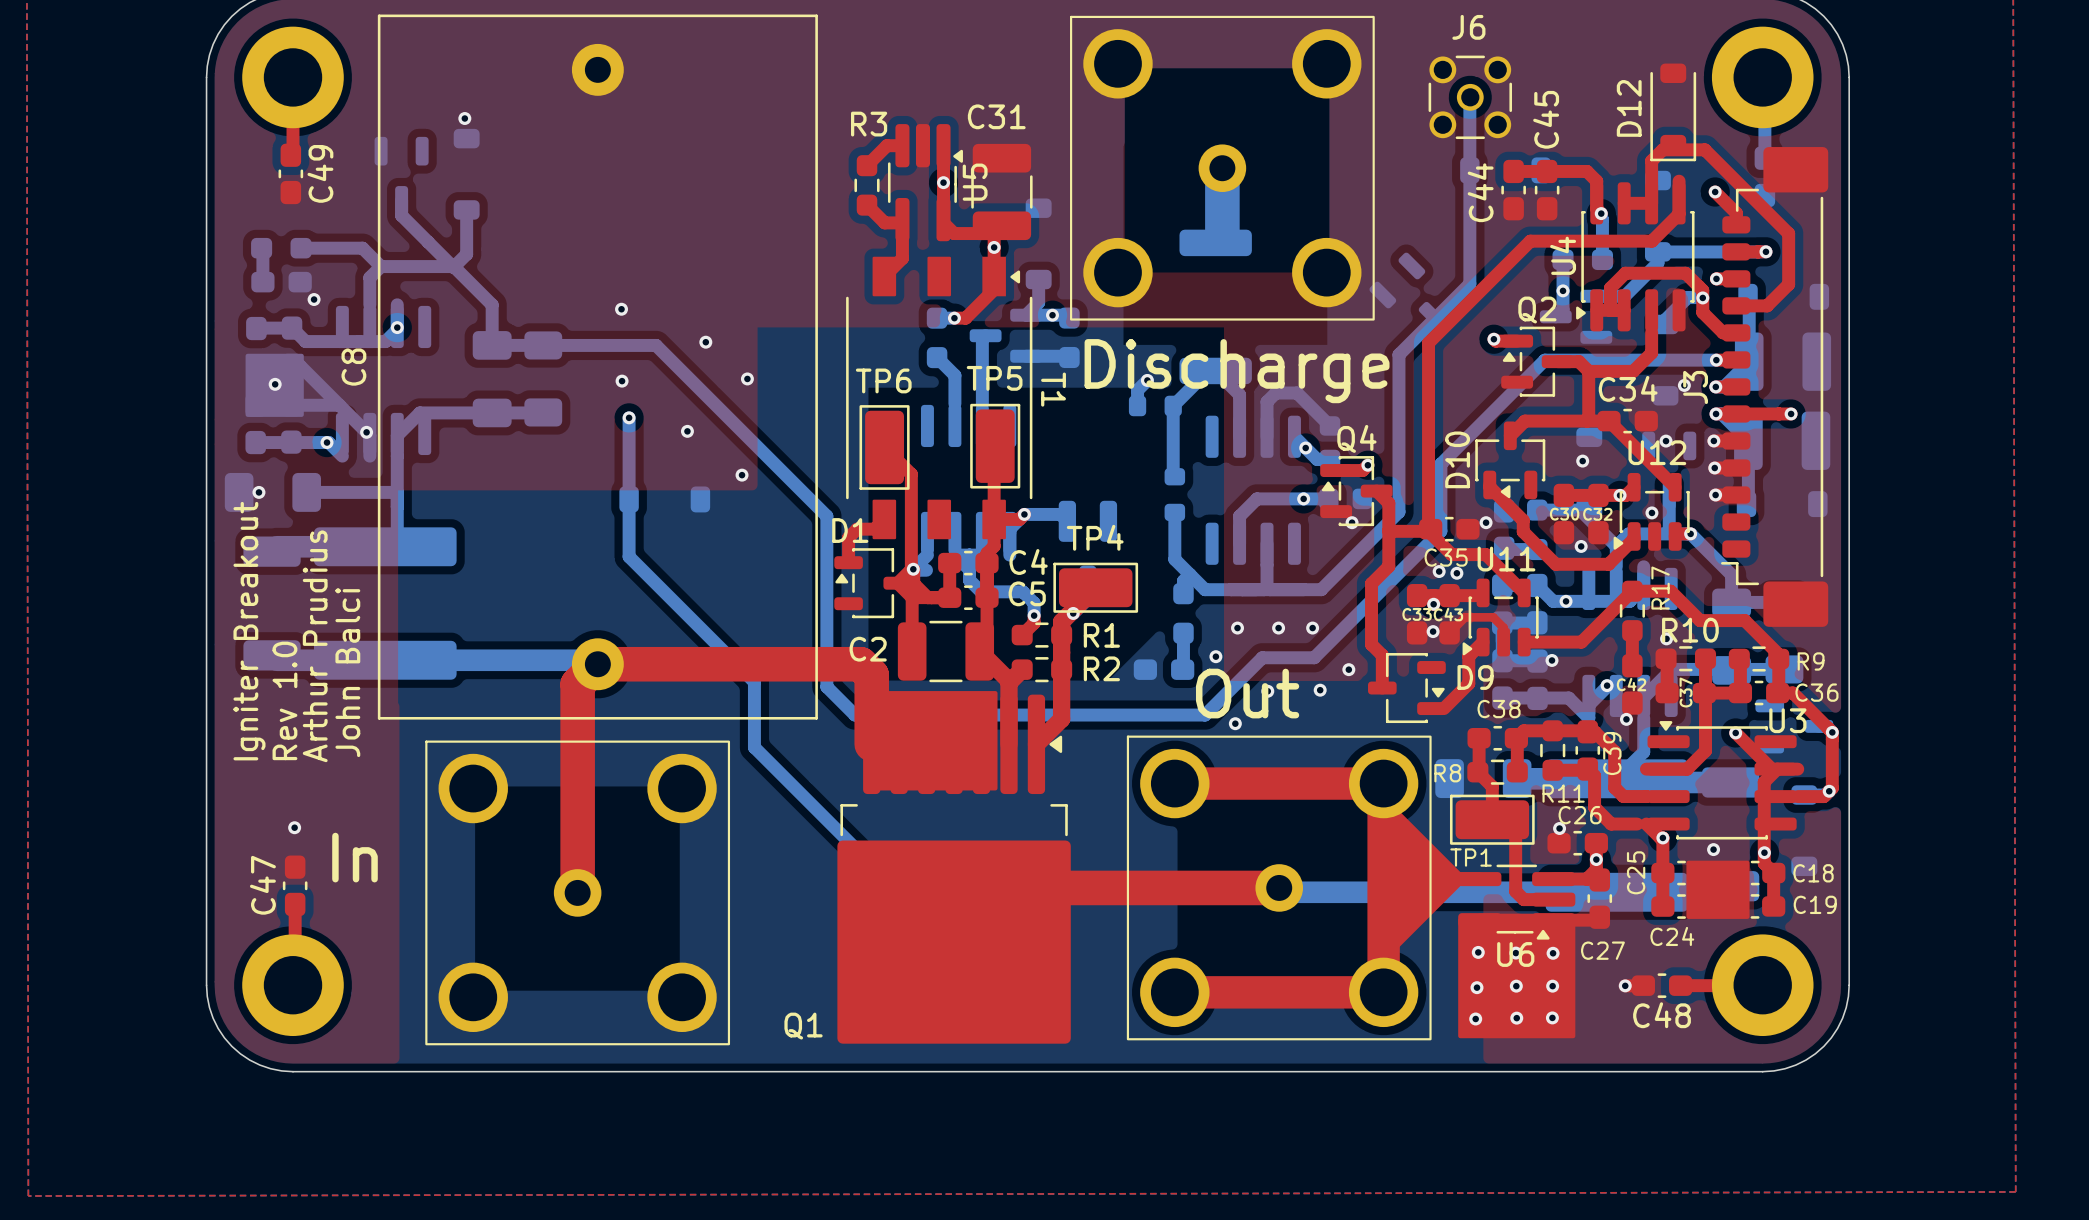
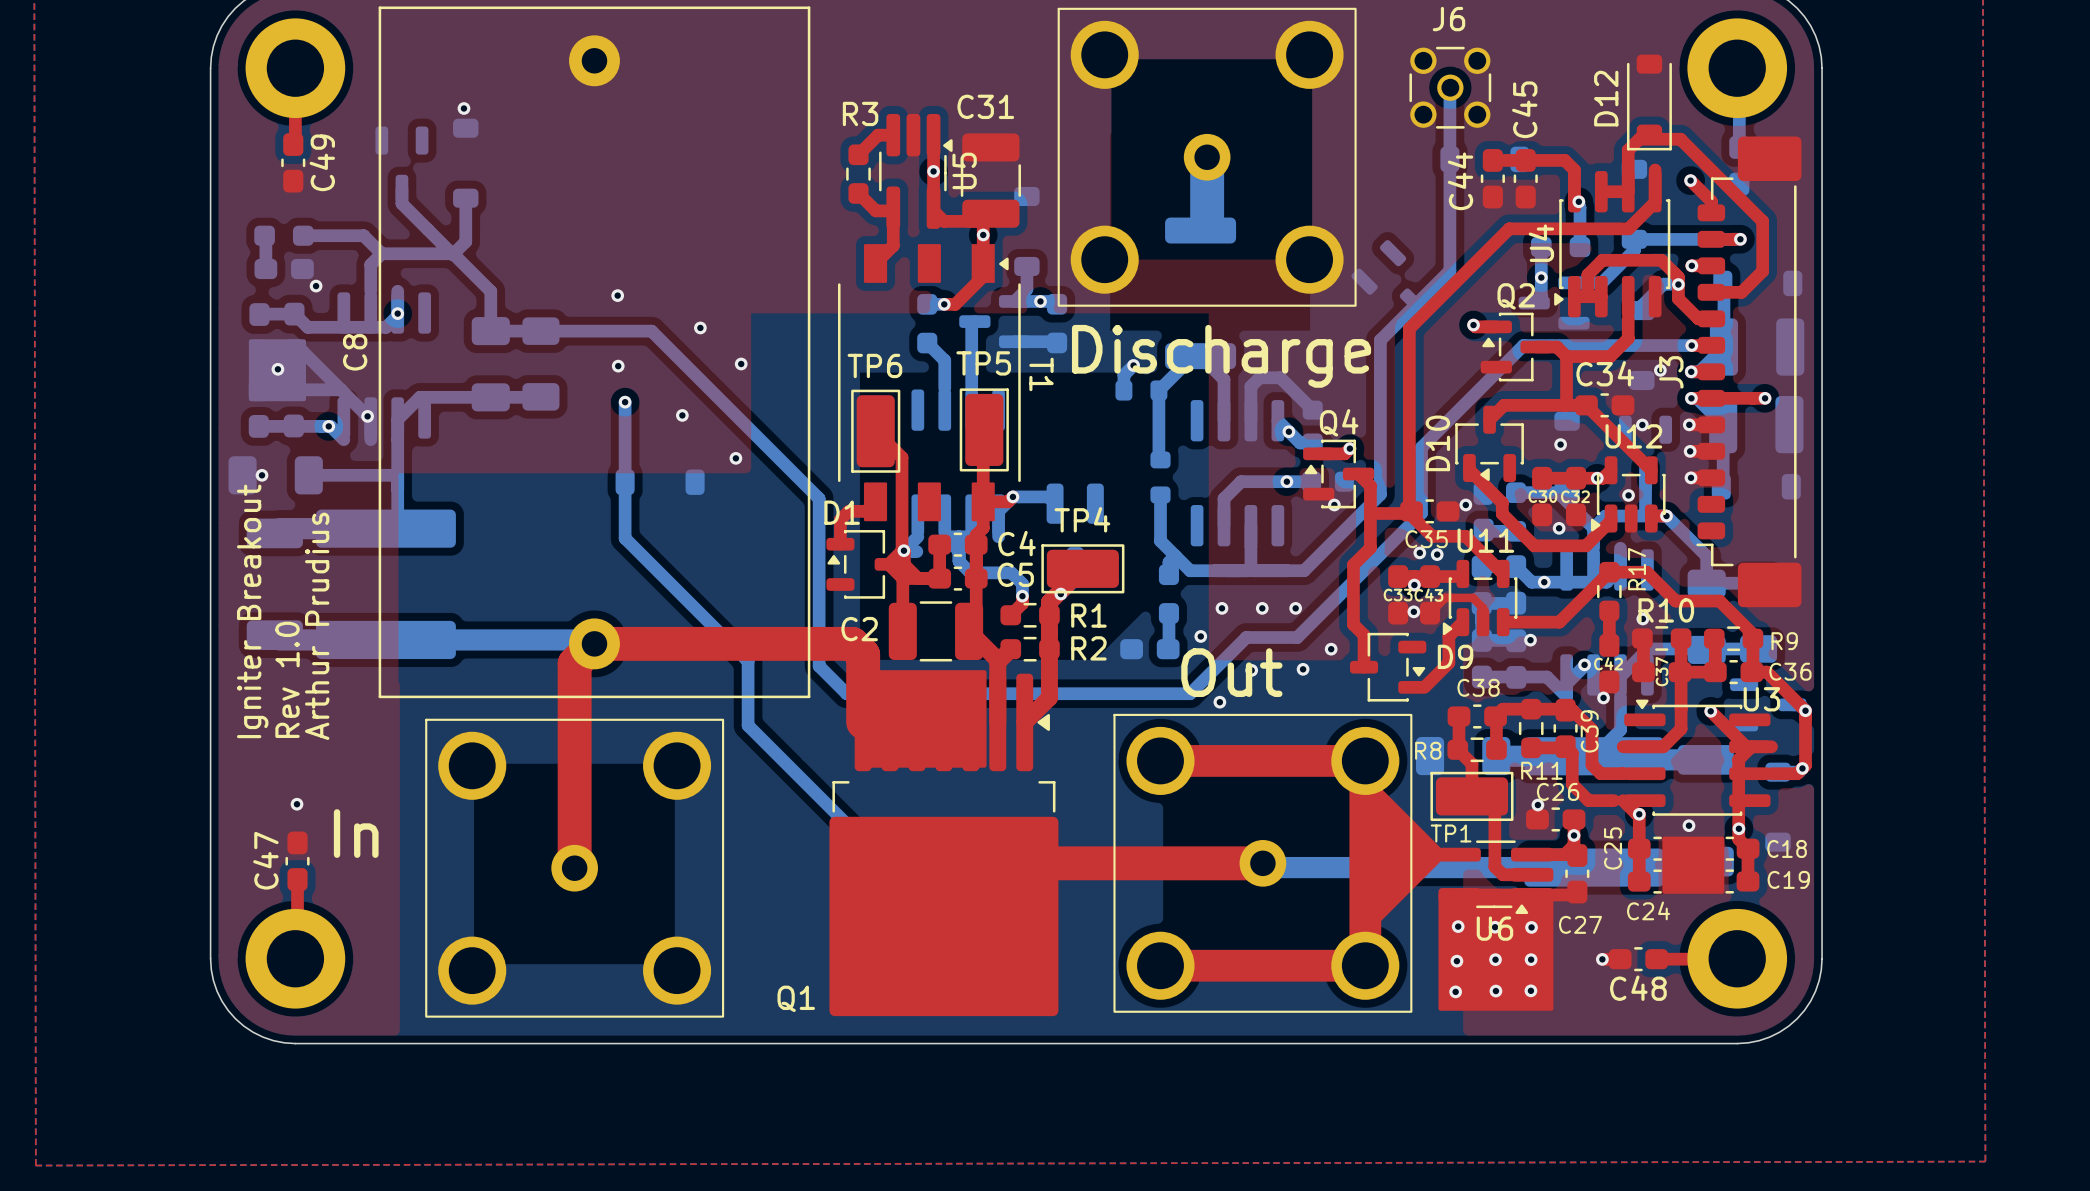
text: John Balci (347, 672) -> none

